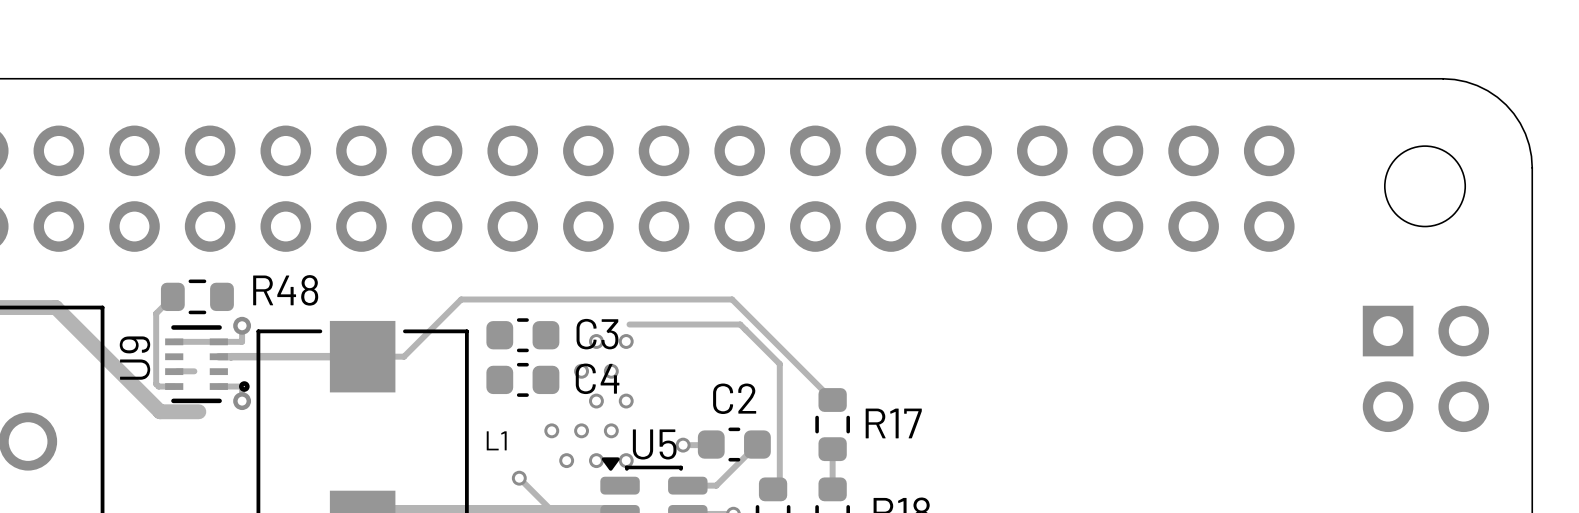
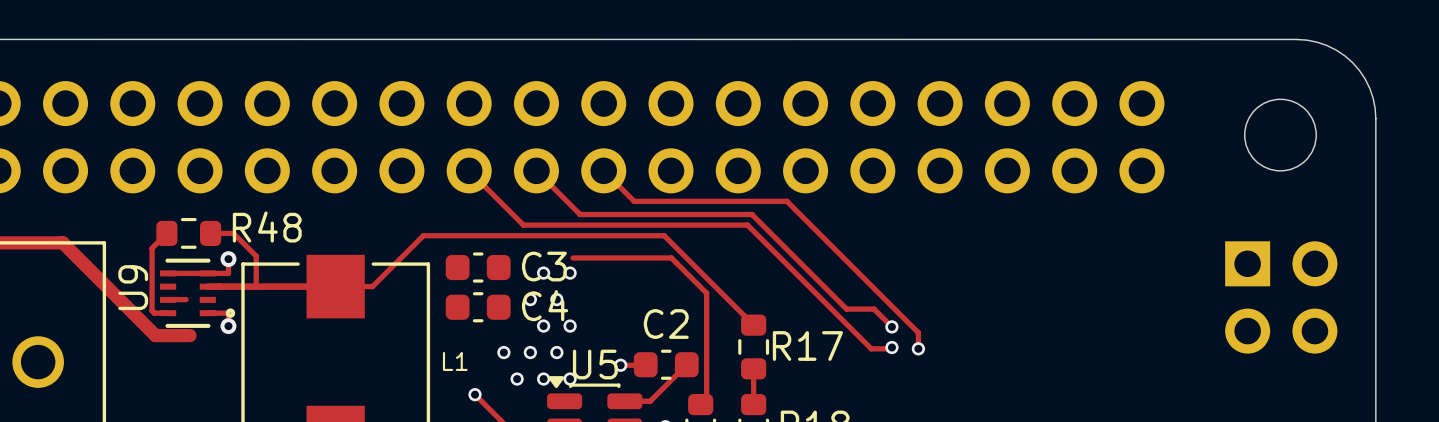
track: none -> (469, 170) (523, 225) (747, 225) (871, 348) (891, 347)
track: none -> (536, 170) (580, 214) (751, 214) (846, 309) (874, 309) (891, 326)
track: none -> (603, 170) (634, 201) (786, 201) (918, 332) (918, 348)
track: none -> (210, 233) (233, 233) (256, 256) (256, 286)
via: none -> (891, 326)
via: none -> (891, 347)
via: none -> (918, 348)

